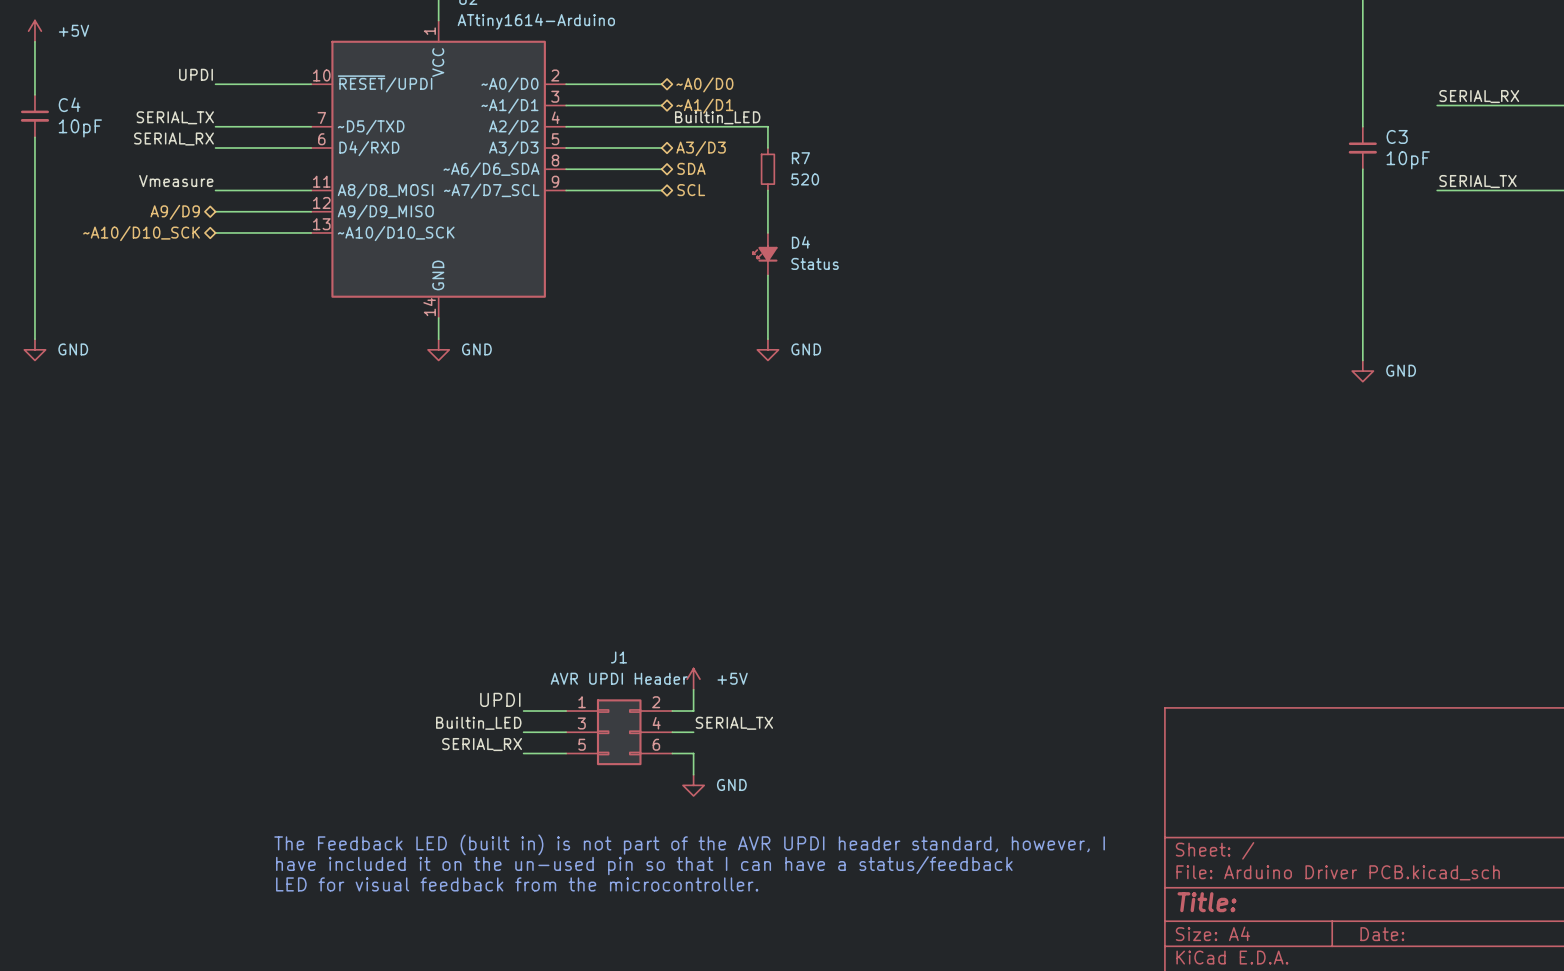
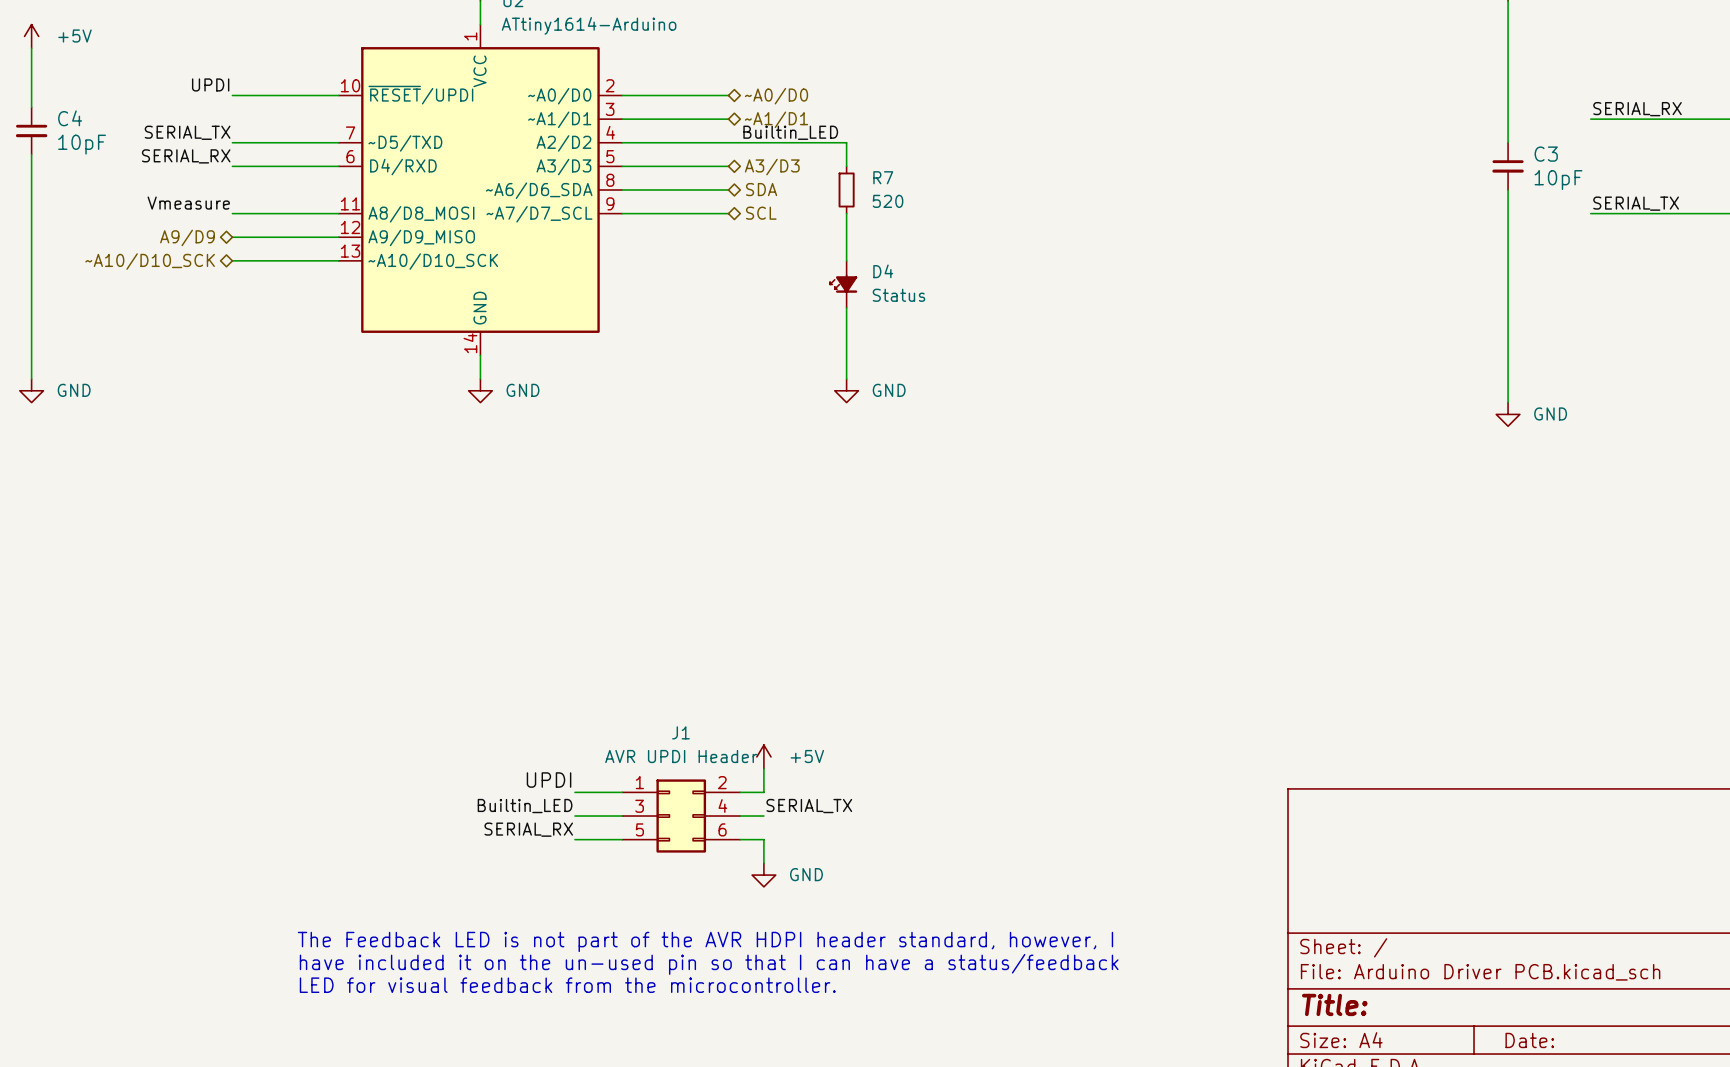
text: The Feedback LED (built in) is not part of the AVR UPDI header standard, however, I (689, 844) -> The Feedback LED is not part of the AVR HDPI header standard, however, I (705, 941)

